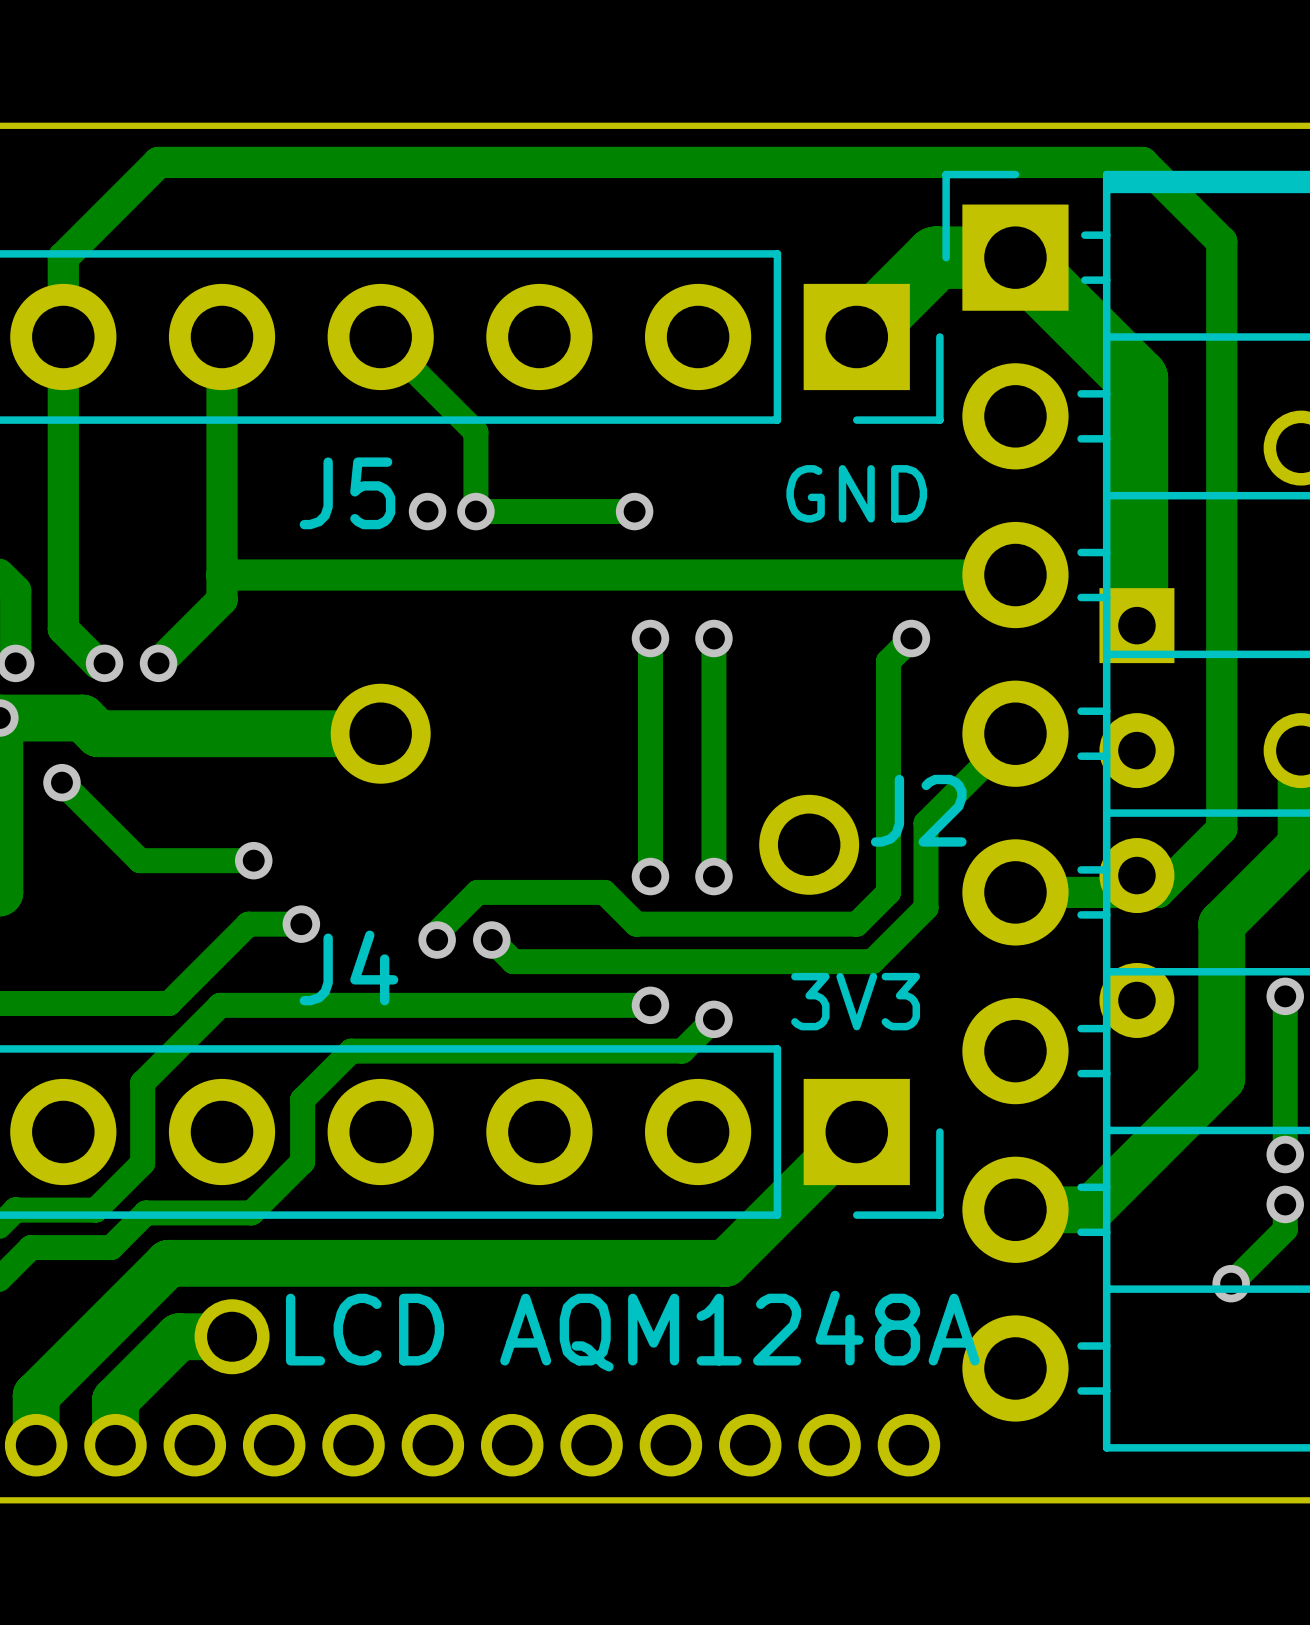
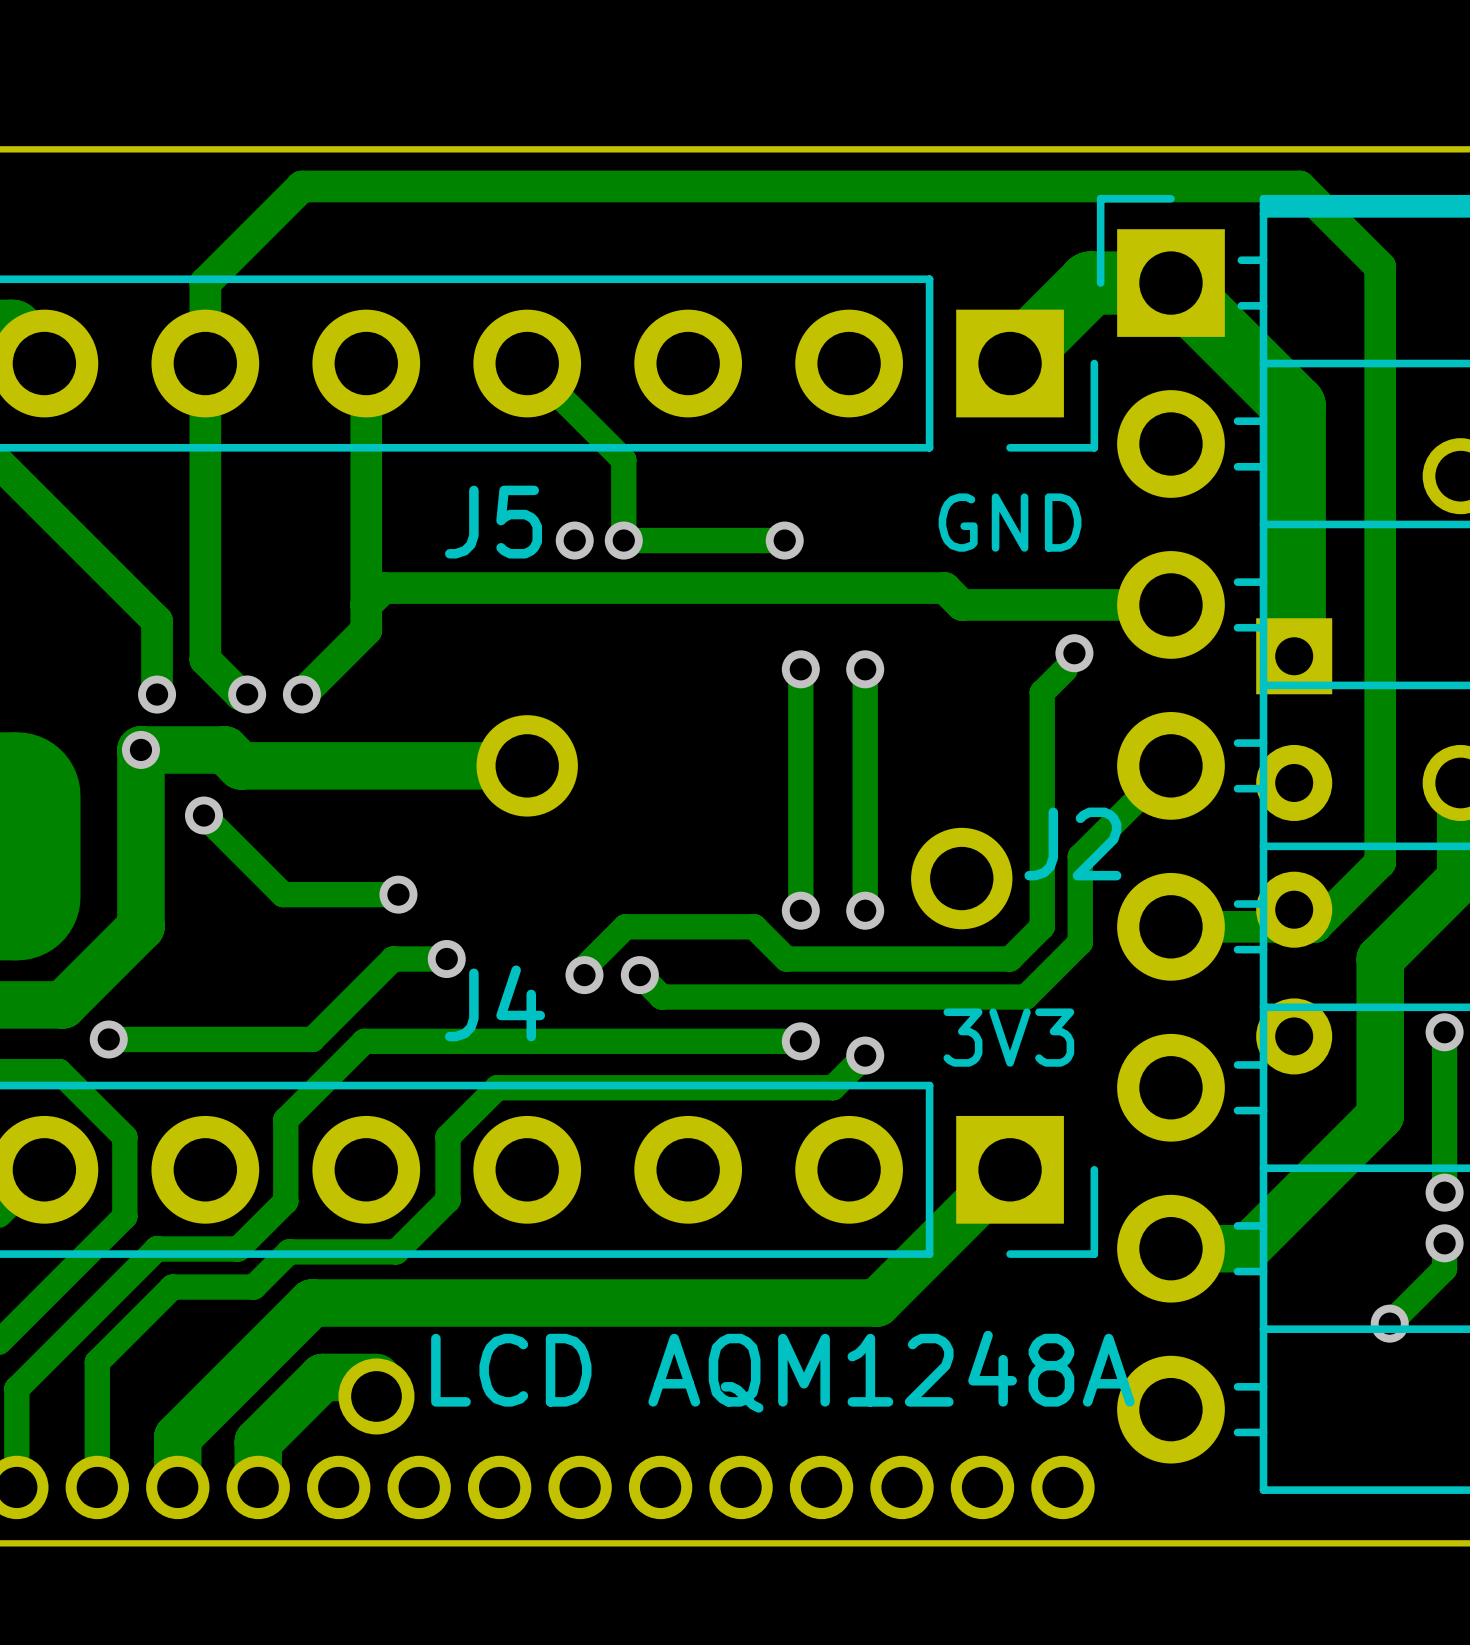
track: (809, 575) (222, 575) -> (961, 604) (944, 588) (383, 588) (366, 604)
via position: (911, 638) -> (1074, 653)
part position: (232, 1336) -> (376, 1396)

